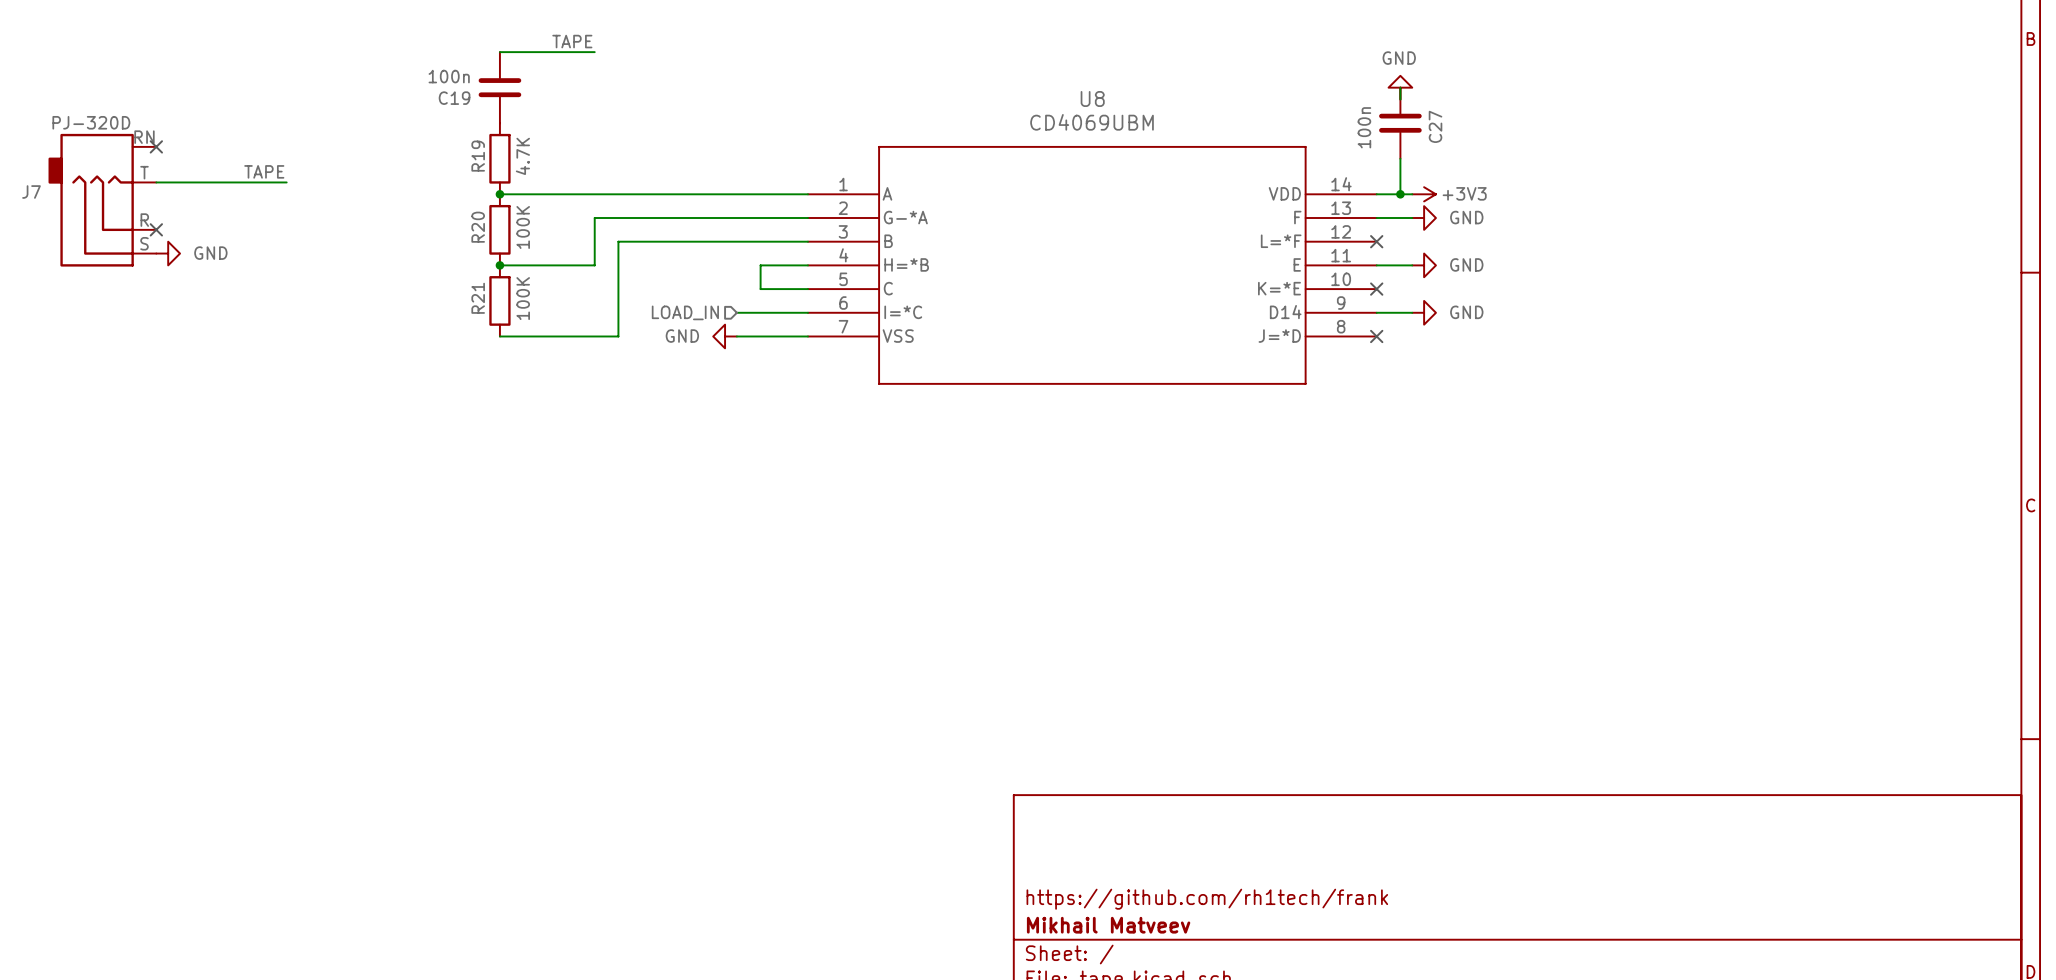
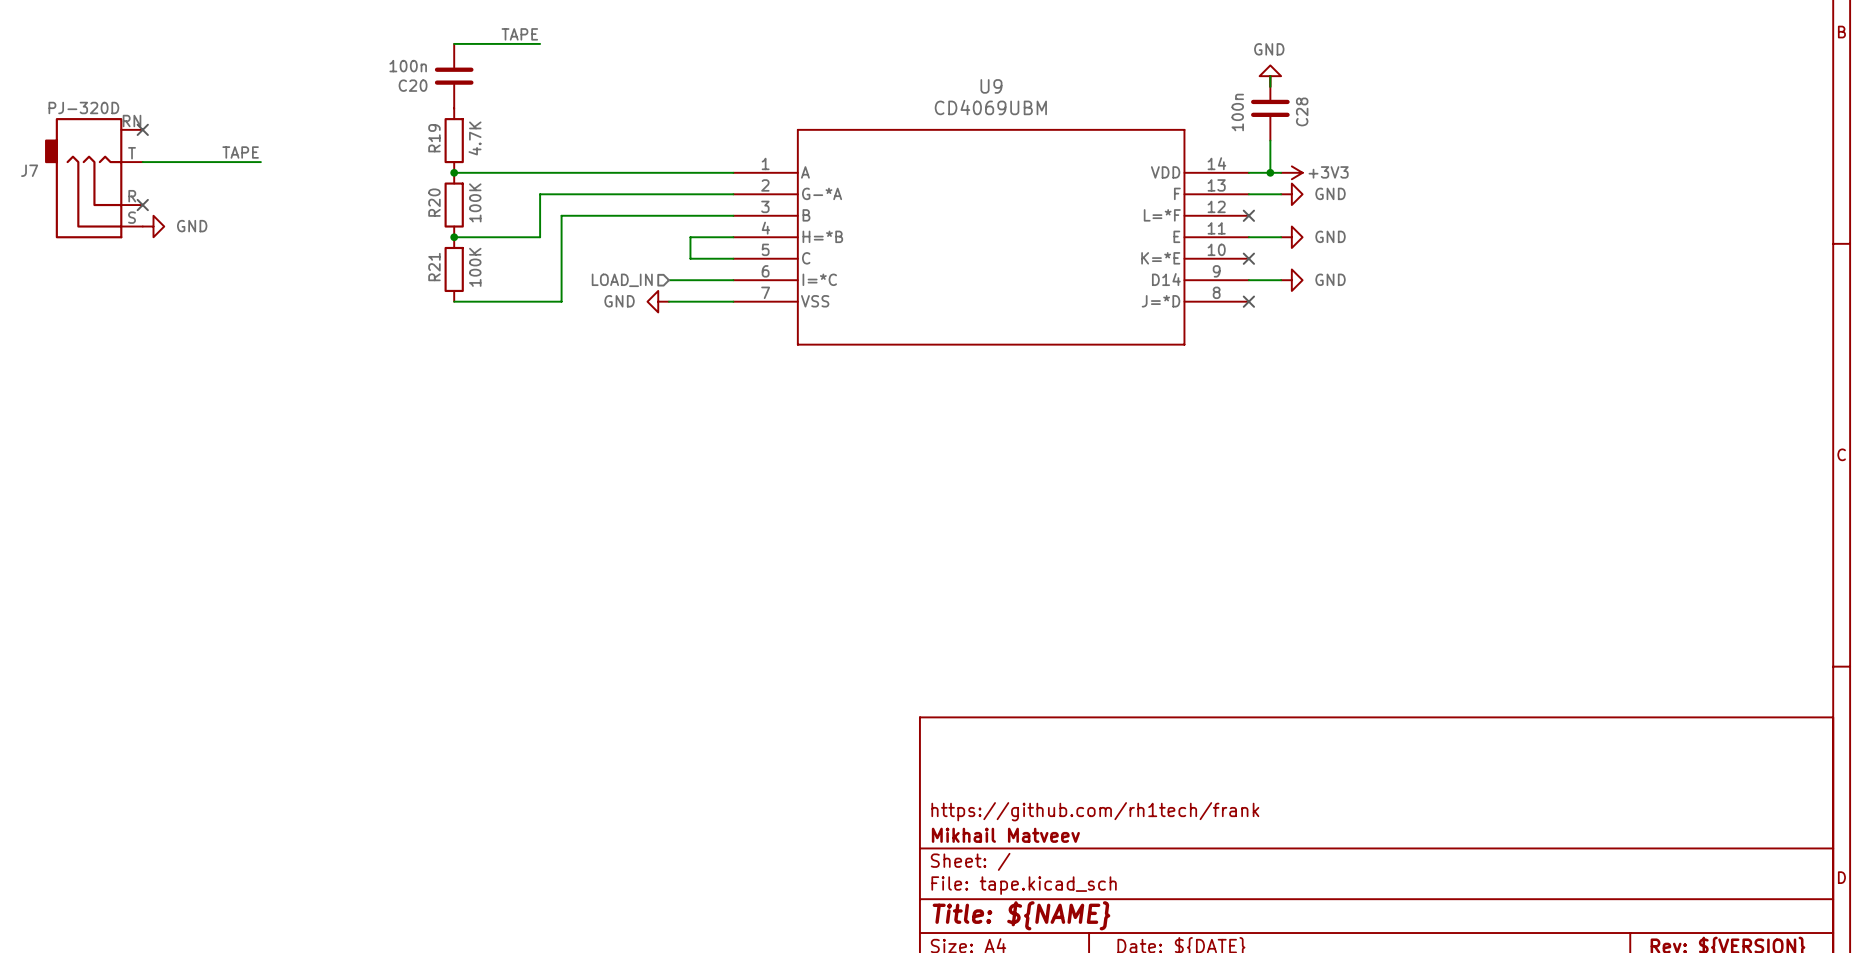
C19 name: C19 (454, 98) -> C20 (413, 85)
U8 name: U8 (1092, 98) -> U9 (991, 86)
C27 name: C27 (1435, 126) -> C28 (1302, 111)

